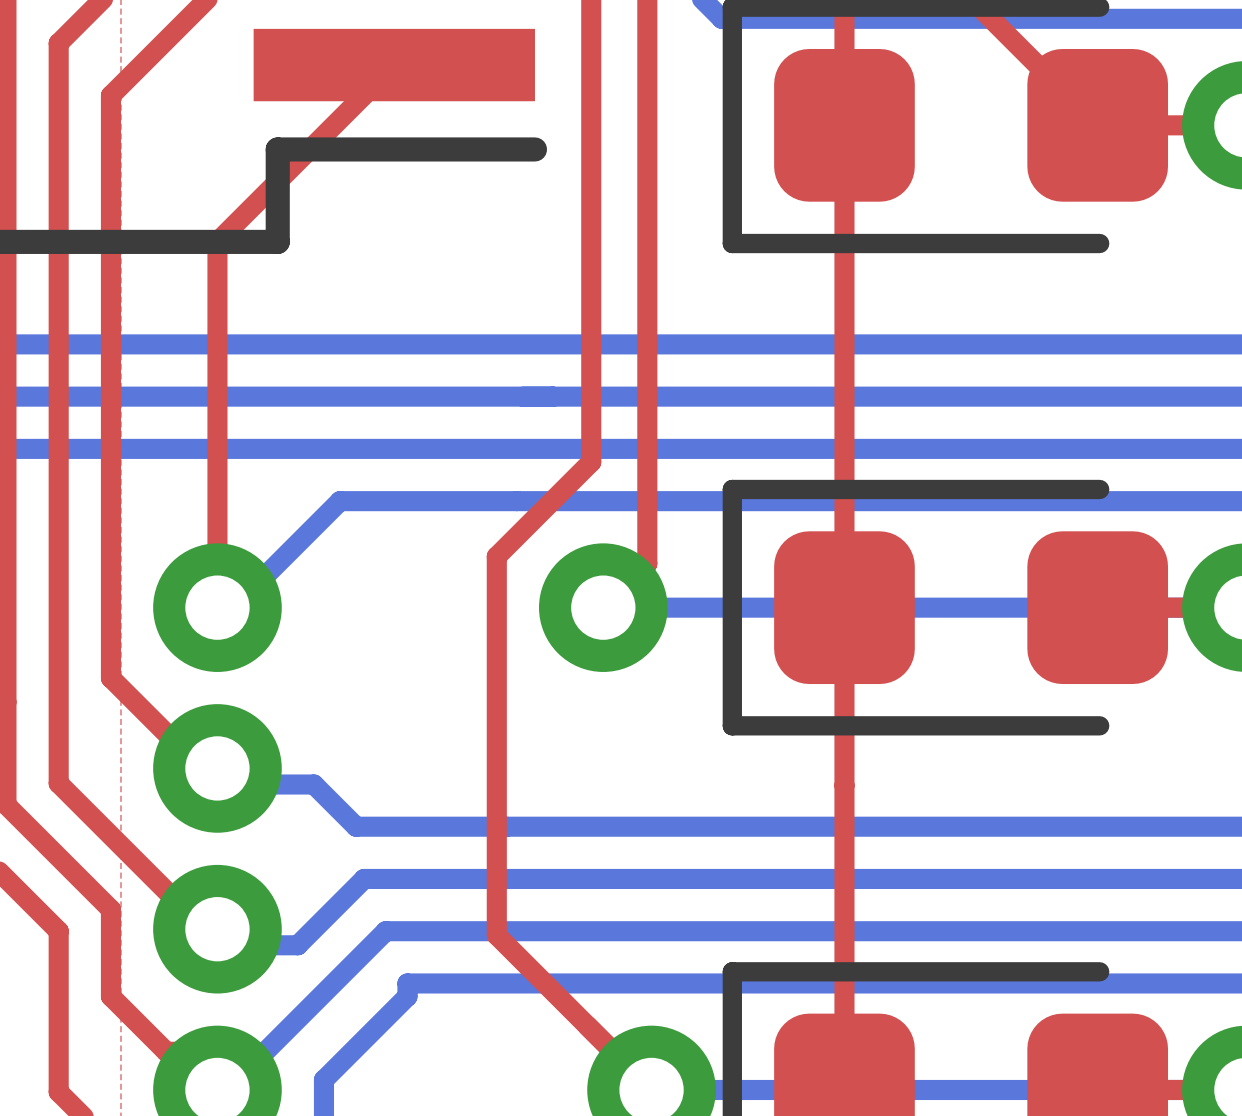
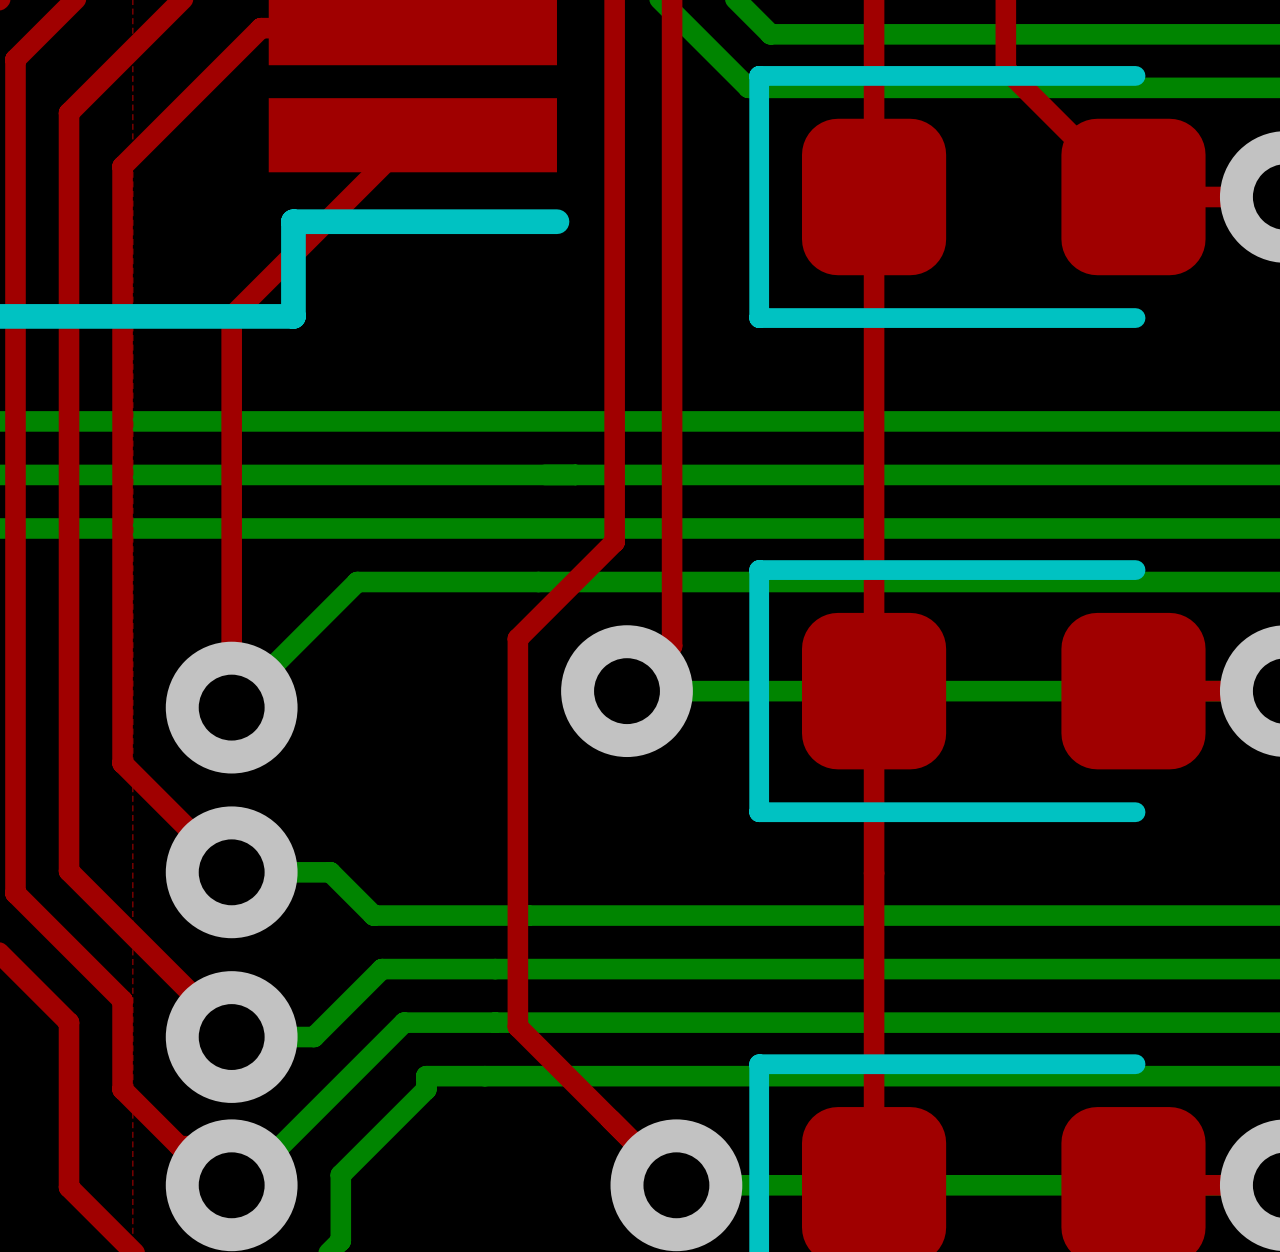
via position: (217, 607) -> (231, 707)
via position: (217, 768) -> (231, 872)
via position: (217, 929) -> (231, 1037)

